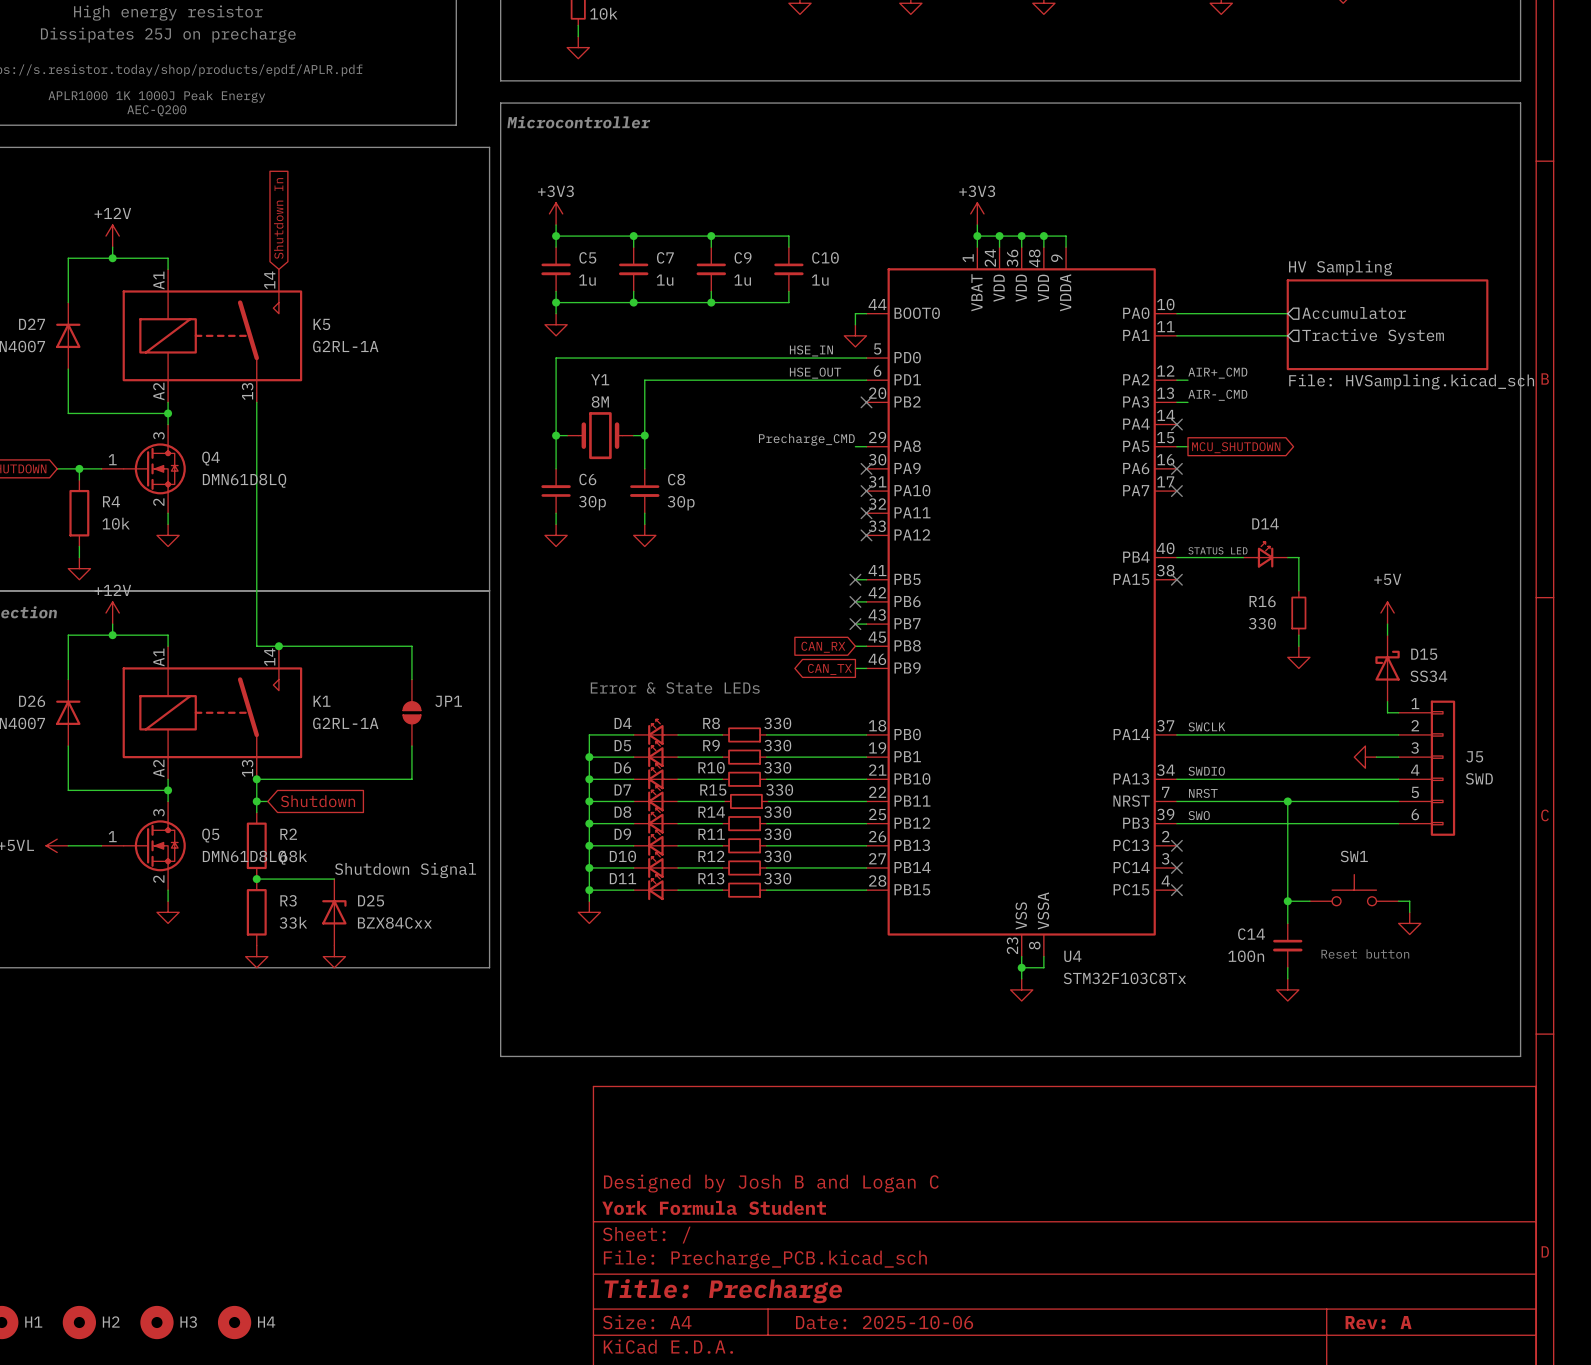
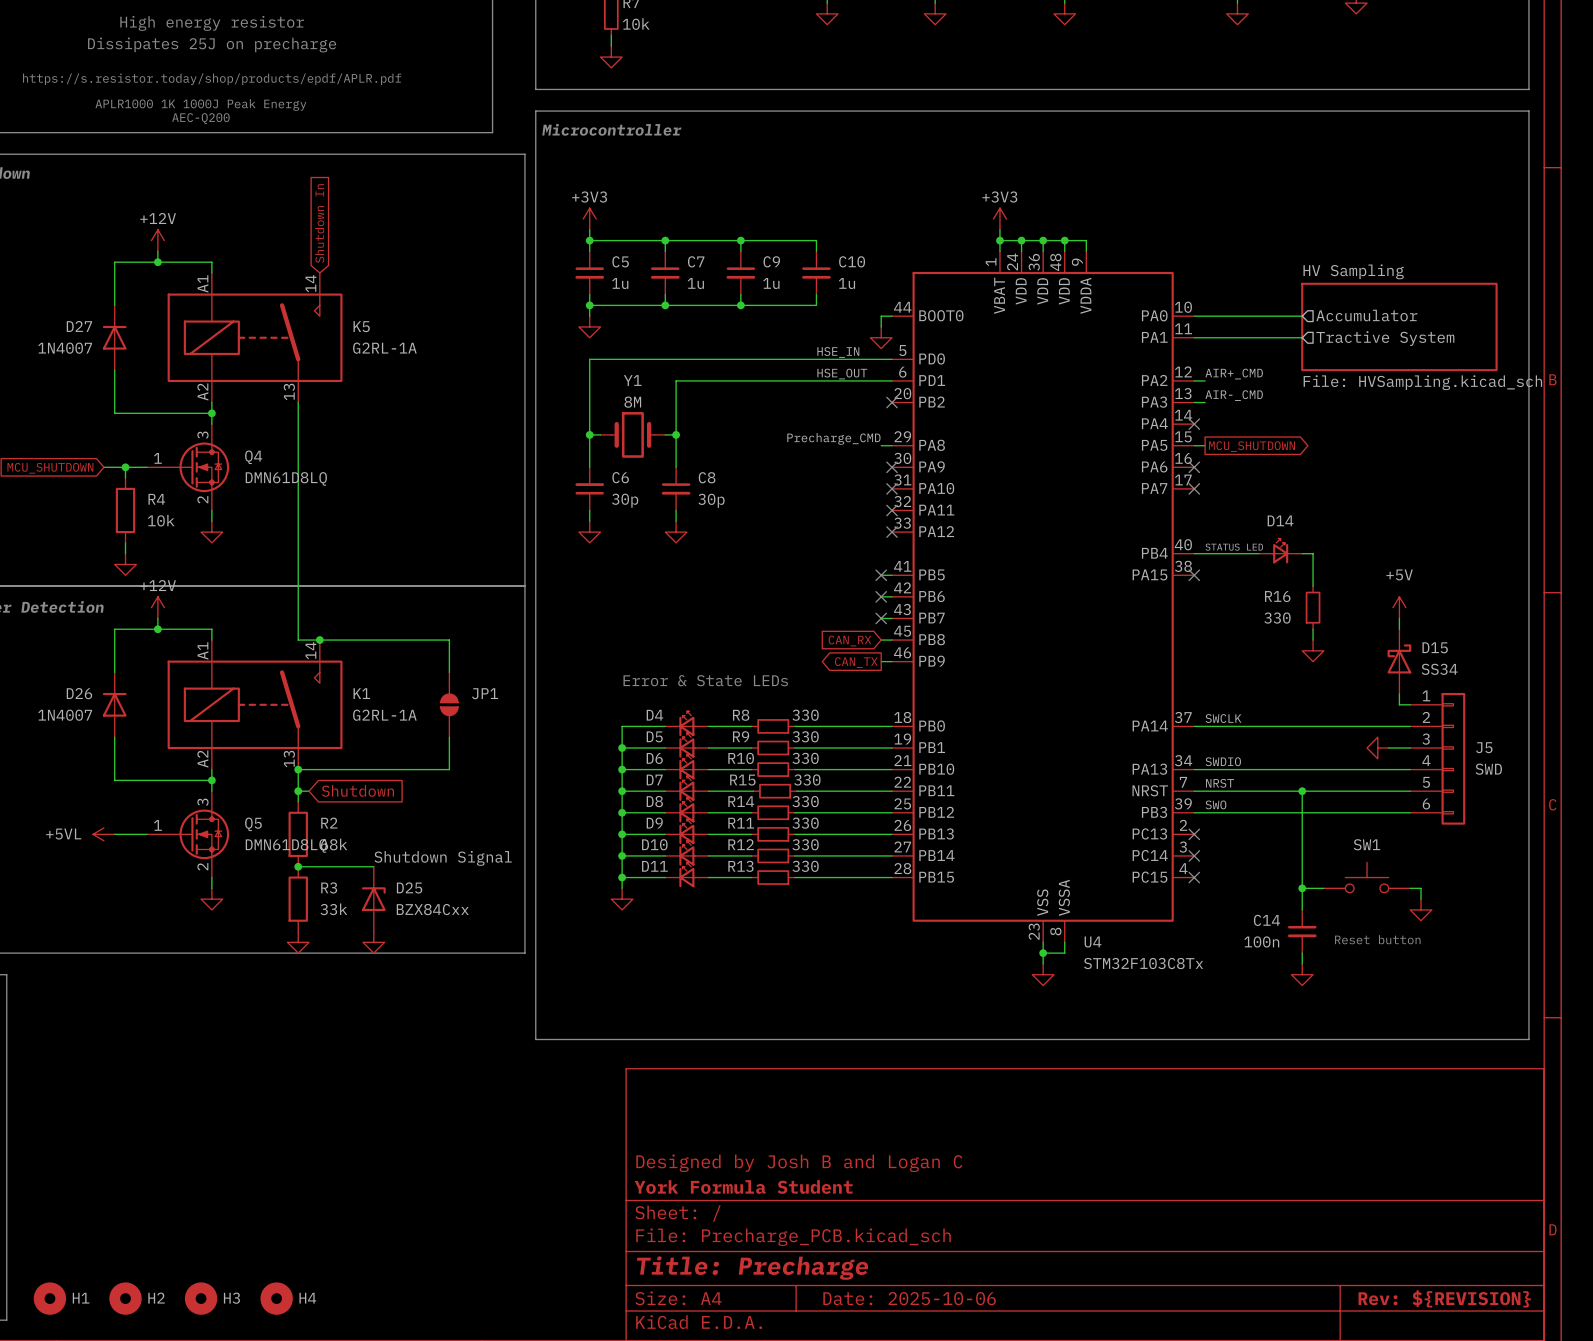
title block: Rev: A (1378, 1322) -> Rev: ${REVISION} (1444, 1298)

